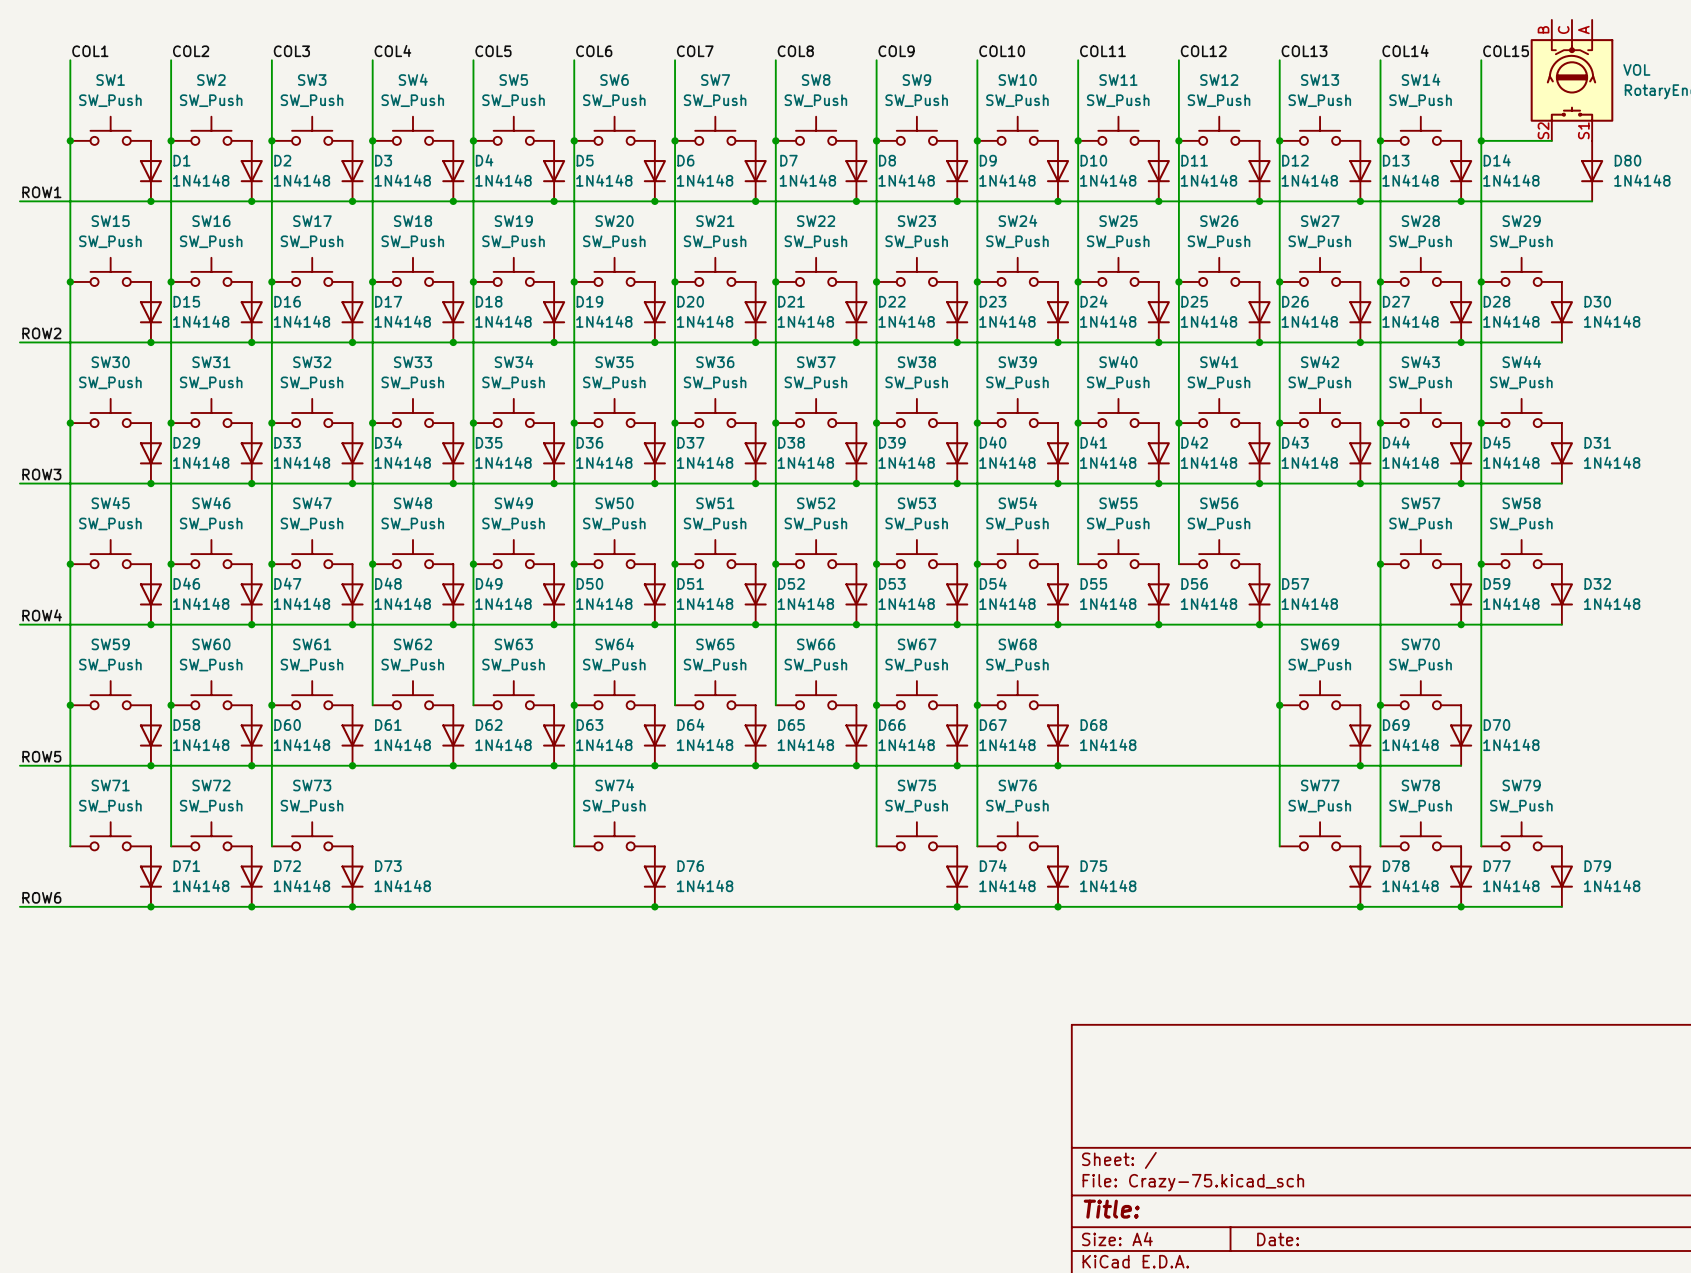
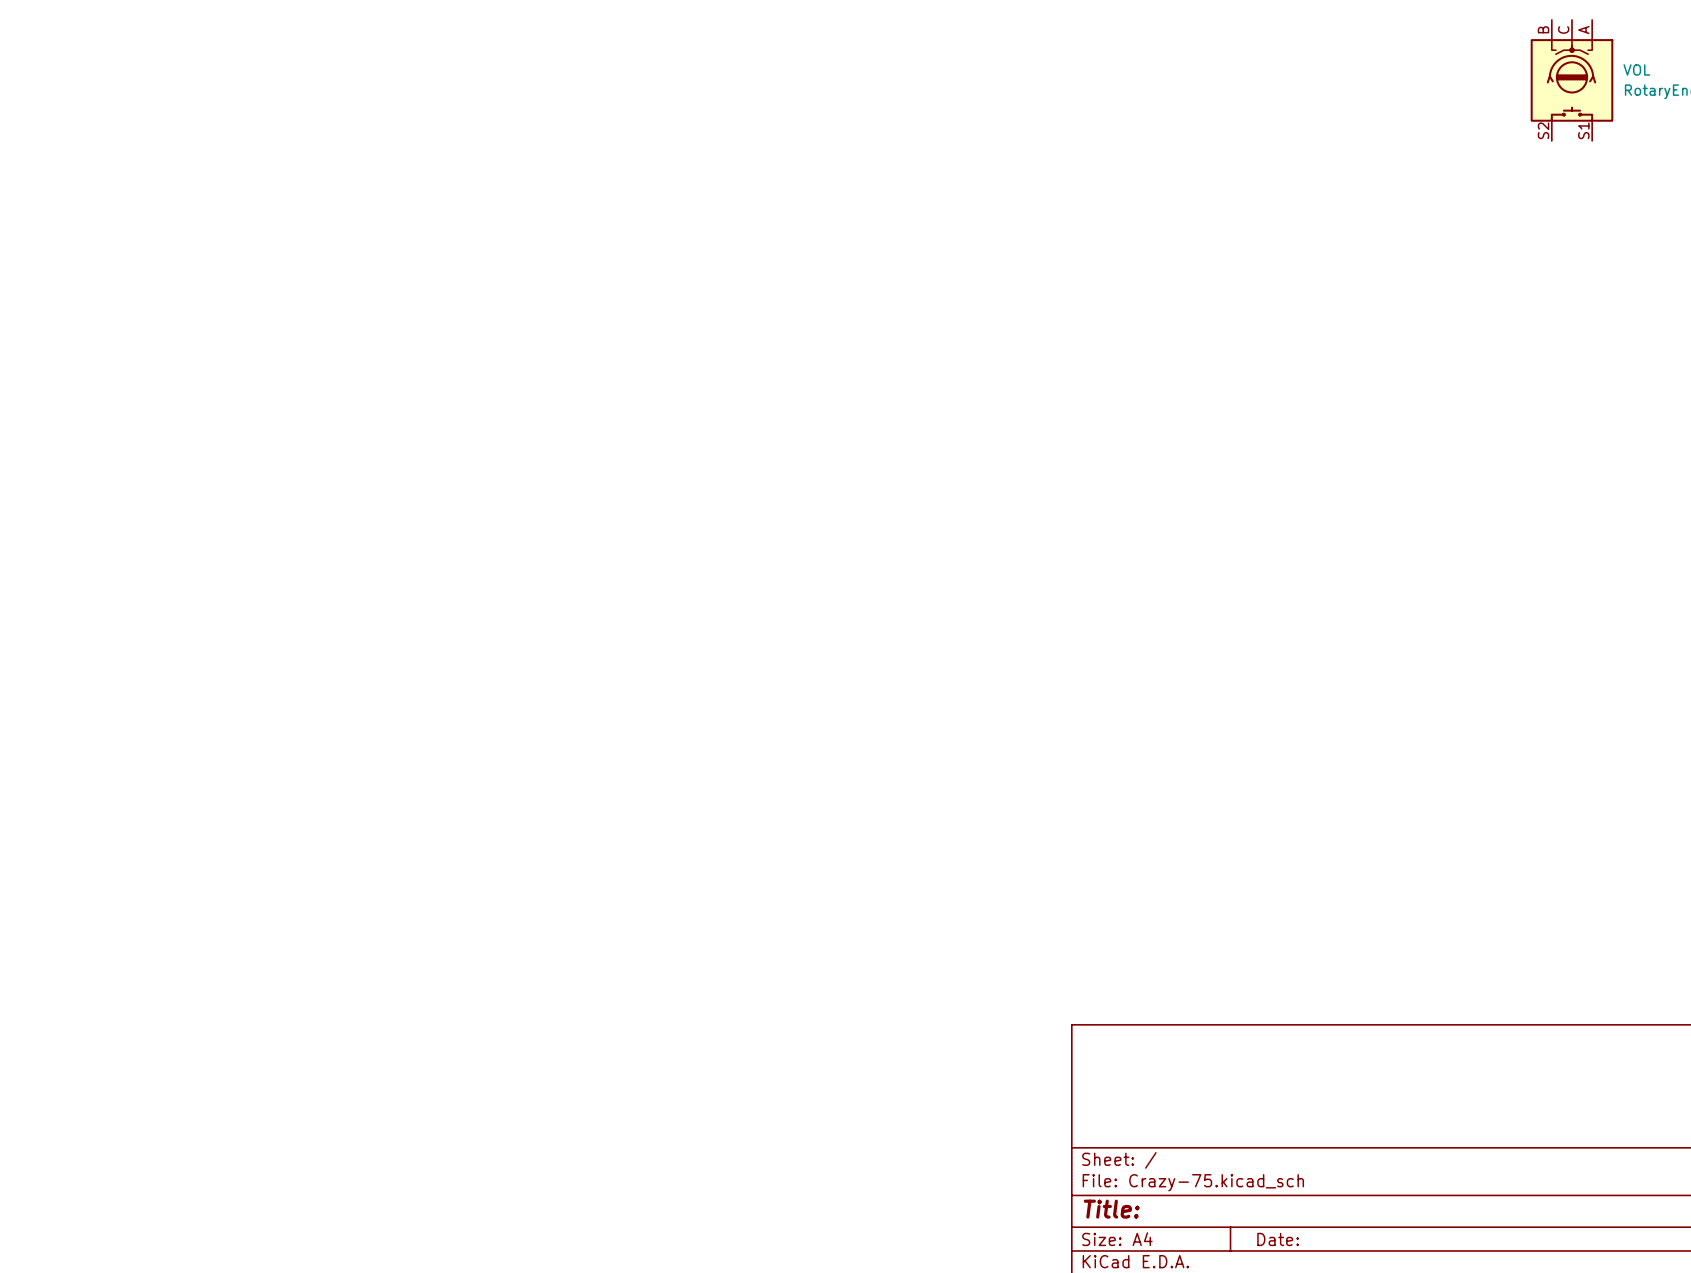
label: COL1 (90, 51) -> none
label: COL2 (191, 51) -> none
label: COL3 (291, 51) -> none
label: COL4 (392, 51) -> none
label: COL5 (493, 51) -> none
label: COL6 (594, 51) -> none
label: COL7 (695, 51) -> none
label: COL8 (795, 51) -> none
label: COL9 (896, 51) -> none
label: COL10 (1002, 51) -> none
label: COL11 (1102, 51) -> none
label: COL12 (1203, 51) -> none
label: COL13 (1304, 51) -> none
label: COL14 (1405, 51) -> none
label: COL15 (1506, 51) -> none
wire: (70, 60) (70, 846) -> none
wire: (171, 60) (171, 846) -> none
wire: (271, 60) (271, 846) -> none
wire: (372, 60) (372, 705) -> none
wire: (473, 60) (473, 705) -> none
wire: (574, 60) (574, 846) -> none
wire: (675, 60) (675, 705) -> none
wire: (775, 60) (775, 705) -> none
wire: (876, 60) (876, 846) -> none
wire: (977, 60) (977, 846) -> none
wire: (1078, 60) (1078, 564) -> none
wire: (1178, 60) (1178, 564) -> none
wire: (1279, 60) (1279, 846) -> none
wire: (1380, 60) (1380, 846) -> none
wire: (1481, 60) (1481, 846) -> none
SW1: SW_Push (110, 130) -> none
SW2: SW_Push (211, 130) -> none
SW3: SW_Push (312, 130) -> none
SW4: SW_Push (412, 130) -> none
SW5: SW_Push (513, 130) -> none
SW6: SW_Push (614, 130) -> none
SW7: SW_Push (715, 130) -> none
SW8: SW_Push (816, 130) -> none
SW9: SW_Push (916, 130) -> none
SW10: SW_Push (1017, 130) -> none
SW11: SW_Push (1118, 130) -> none
SW12: SW_Push (1219, 130) -> none
SW13: SW_Push (1320, 130) -> none
SW14: SW_Push (1420, 130) -> none
junction: (70, 140) -> none
junction: (171, 140) -> none
junction: (271, 140) -> none
junction: (372, 140) -> none
junction: (473, 140) -> none
junction: (574, 140) -> none
junction: (675, 140) -> none
junction: (775, 140) -> none
junction: (876, 140) -> none
junction: (977, 140) -> none
junction: (1078, 140) -> none
junction: (1178, 140) -> none
junction: (1279, 140) -> none
junction: (1380, 140) -> none
wire: (1481, 140) (1551, 140) -> none
junction: (1481, 140) -> none
D1: 1N4148 (150, 171) -> none
D2: 1N4148 (251, 171) -> none
D3: 1N4148 (352, 171) -> none
D4: 1N4148 (453, 171) -> none
D5: 1N4148 (554, 171) -> none
D6: 1N4148 (654, 171) -> none
D7: 1N4148 (755, 171) -> none
D8: 1N4148 (856, 171) -> none
D9: 1N4148 (957, 171) -> none
D10: 1N4148 (1058, 171) -> none
D11: 1N4148 (1158, 171) -> none
D12: 1N4148 (1259, 171) -> none
D13: 1N4148 (1360, 171) -> none
D14: 1N4148 (1461, 171) -> none
D80: 1N4148 (1592, 171) -> none
label: ROW1 (41, 192) -> none
wire: (19, 201) (1592, 201) -> none
junction: (150, 201) -> none
junction: (251, 201) -> none
junction: (352, 201) -> none
junction: (453, 201) -> none
junction: (554, 201) -> none
junction: (654, 201) -> none
junction: (755, 201) -> none
junction: (856, 201) -> none
junction: (957, 201) -> none
junction: (1058, 201) -> none
junction: (1158, 201) -> none
junction: (1259, 201) -> none
junction: (1360, 201) -> none
junction: (1461, 201) -> none
SW15: SW_Push (110, 271) -> none
SW16: SW_Push (211, 271) -> none
SW17: SW_Push (312, 271) -> none
SW18: SW_Push (412, 271) -> none
SW19: SW_Push (513, 271) -> none
SW20: SW_Push (614, 271) -> none
SW21: SW_Push (715, 271) -> none
SW22: SW_Push (816, 271) -> none
SW23: SW_Push (916, 271) -> none
SW24: SW_Push (1017, 271) -> none
SW25: SW_Push (1118, 271) -> none
SW26: SW_Push (1219, 271) -> none
SW27: SW_Push (1320, 271) -> none
SW28: SW_Push (1420, 271) -> none
SW29: SW_Push (1521, 271) -> none
junction: (70, 281) -> none
junction: (171, 281) -> none
junction: (271, 281) -> none
junction: (372, 281) -> none
junction: (473, 281) -> none
junction: (574, 281) -> none
junction: (675, 281) -> none
junction: (775, 281) -> none
junction: (876, 281) -> none
junction: (977, 281) -> none
junction: (1078, 281) -> none
junction: (1178, 281) -> none
junction: (1279, 281) -> none
junction: (1380, 281) -> none
junction: (1481, 281) -> none
D15: 1N4148 (150, 312) -> none
D16: 1N4148 (251, 312) -> none
D17: 1N4148 (352, 312) -> none
D18: 1N4148 (453, 312) -> none
D19: 1N4148 (554, 312) -> none
D20: 1N4148 (654, 312) -> none
D21: 1N4148 (755, 312) -> none
D22: 1N4148 (856, 312) -> none
D23: 1N4148 (957, 312) -> none
D24: 1N4148 (1058, 312) -> none
D25: 1N4148 (1158, 312) -> none
D26: 1N4148 (1259, 312) -> none
D27: 1N4148 (1360, 312) -> none
D28: 1N4148 (1461, 312) -> none
D30: 1N4148 (1561, 312) -> none
label: ROW2 (41, 333) -> none
wire: (19, 342) (1561, 342) -> none
junction: (150, 342) -> none
junction: (251, 342) -> none
junction: (352, 342) -> none
junction: (453, 342) -> none
junction: (554, 342) -> none
junction: (654, 342) -> none
junction: (755, 342) -> none
junction: (856, 342) -> none
junction: (957, 342) -> none
junction: (1058, 342) -> none
junction: (1158, 342) -> none
junction: (1259, 342) -> none
junction: (1360, 342) -> none
junction: (1461, 342) -> none
SW30: SW_Push (110, 412) -> none
SW31: SW_Push (211, 412) -> none
SW32: SW_Push (312, 412) -> none
SW33: SW_Push (412, 412) -> none
SW34: SW_Push (513, 412) -> none
SW35: SW_Push (614, 412) -> none
SW36: SW_Push (715, 412) -> none
SW37: SW_Push (816, 412) -> none
SW38: SW_Push (916, 412) -> none
SW39: SW_Push (1017, 412) -> none
SW40: SW_Push (1118, 412) -> none
SW41: SW_Push (1219, 412) -> none
SW42: SW_Push (1320, 412) -> none
SW43: SW_Push (1420, 412) -> none
SW44: SW_Push (1521, 412) -> none
junction: (70, 423) -> none
junction: (171, 423) -> none
junction: (271, 423) -> none
junction: (372, 423) -> none
junction: (473, 423) -> none
junction: (574, 423) -> none
junction: (675, 423) -> none
junction: (775, 423) -> none
junction: (876, 423) -> none
junction: (977, 423) -> none
junction: (1078, 423) -> none
junction: (1178, 423) -> none
junction: (1279, 423) -> none
junction: (1380, 423) -> none
junction: (1481, 423) -> none
D29: 1N4148 (150, 453) -> none
D33: 1N4148 (251, 453) -> none
D34: 1N4148 (352, 453) -> none
D35: 1N4148 (453, 453) -> none
D36: 1N4148 (554, 453) -> none
D37: 1N4148 (654, 453) -> none
D38: 1N4148 (755, 453) -> none
D39: 1N4148 (856, 453) -> none
D40: 1N4148 (957, 453) -> none
D41: 1N4148 (1058, 453) -> none
D42: 1N4148 (1158, 453) -> none
D43: 1N4148 (1259, 453) -> none
D44: 1N4148 (1360, 453) -> none
D45: 1N4148 (1461, 453) -> none
D31: 1N4148 (1561, 453) -> none
label: ROW3 (41, 474) -> none
wire: (19, 483) (1561, 483) -> none
junction: (150, 483) -> none
junction: (251, 483) -> none
junction: (352, 483) -> none
junction: (453, 483) -> none
junction: (554, 483) -> none
junction: (654, 483) -> none
junction: (755, 483) -> none
junction: (856, 483) -> none
junction: (957, 483) -> none
junction: (1058, 483) -> none
junction: (1158, 483) -> none
junction: (1259, 483) -> none
junction: (1360, 483) -> none
junction: (1461, 483) -> none
SW45: SW_Push (110, 554) -> none
SW46: SW_Push (211, 554) -> none
SW47: SW_Push (312, 554) -> none
SW48: SW_Push (412, 554) -> none
SW49: SW_Push (513, 554) -> none
SW50: SW_Push (614, 554) -> none
SW51: SW_Push (715, 554) -> none
SW52: SW_Push (816, 554) -> none
SW53: SW_Push (916, 554) -> none
SW54: SW_Push (1017, 554) -> none
SW55: SW_Push (1118, 554) -> none
SW56: SW_Push (1219, 554) -> none
SW57: SW_Push (1420, 554) -> none
SW58: SW_Push (1521, 554) -> none
junction: (70, 564) -> none
junction: (171, 564) -> none
junction: (271, 564) -> none
junction: (372, 564) -> none
junction: (473, 564) -> none
junction: (574, 564) -> none
junction: (675, 564) -> none
junction: (775, 564) -> none
junction: (876, 564) -> none
junction: (977, 564) -> none
junction: (1380, 564) -> none
junction: (1481, 564) -> none
D46: 1N4148 (150, 594) -> none
D47: 1N4148 (251, 594) -> none
D48: 1N4148 (352, 594) -> none
D49: 1N4148 (453, 594) -> none
D50: 1N4148 (554, 594) -> none
D51: 1N4148 (654, 594) -> none
D52: 1N4148 (755, 594) -> none
D53: 1N4148 (856, 594) -> none
D54: 1N4148 (957, 594) -> none
D55: 1N4148 (1058, 594) -> none
D56: 1N4148 (1158, 594) -> none
D57: 1N4148 (1259, 594) -> none
D59: 1N4148 (1461, 594) -> none
D32: 1N4148 (1561, 594) -> none
label: ROW4 (42, 615) -> none
wire: (19, 624) (1561, 624) -> none
junction: (150, 624) -> none
junction: (251, 624) -> none
junction: (352, 624) -> none
junction: (453, 624) -> none
junction: (554, 624) -> none
junction: (654, 624) -> none
junction: (755, 624) -> none
junction: (856, 624) -> none
junction: (957, 624) -> none
junction: (1058, 624) -> none
junction: (1158, 624) -> none
junction: (1259, 624) -> none
junction: (1461, 624) -> none
SW59: SW_Push (110, 695) -> none
SW60: SW_Push (211, 695) -> none
SW61: SW_Push (312, 695) -> none
SW62: SW_Push (412, 695) -> none
SW63: SW_Push (513, 695) -> none
SW64: SW_Push (614, 695) -> none
SW65: SW_Push (715, 695) -> none
SW66: SW_Push (816, 695) -> none
SW67: SW_Push (916, 695) -> none
SW68: SW_Push (1017, 695) -> none
SW69: SW_Push (1320, 695) -> none
SW70: SW_Push (1420, 695) -> none
junction: (70, 705) -> none
junction: (171, 705) -> none
junction: (271, 705) -> none
junction: (574, 705) -> none
junction: (876, 705) -> none
junction: (977, 705) -> none
junction: (1279, 705) -> none
junction: (1380, 705) -> none
D58: 1N4148 (150, 735) -> none
D60: 1N4148 (251, 735) -> none
D61: 1N4148 (352, 735) -> none
D62: 1N4148 (453, 735) -> none
D63: 1N4148 (554, 735) -> none
D64: 1N4148 (654, 735) -> none
D65: 1N4148 (755, 735) -> none
D66: 1N4148 (856, 735) -> none
D67: 1N4148 (957, 735) -> none
D68: 1N4148 (1058, 735) -> none
D69: 1N4148 (1360, 735) -> none
D70: 1N4148 (1461, 735) -> none
label: ROW5 (41, 756) -> none
wire: (19, 765) (1461, 765) -> none
junction: (150, 765) -> none
junction: (251, 765) -> none
junction: (352, 765) -> none
junction: (453, 765) -> none
junction: (554, 765) -> none
junction: (654, 765) -> none
junction: (755, 765) -> none
junction: (856, 765) -> none
junction: (957, 765) -> none
junction: (1058, 765) -> none
junction: (1360, 765) -> none
SW71: SW_Push (110, 836) -> none
SW72: SW_Push (211, 836) -> none
SW73: SW_Push (312, 836) -> none
SW74: SW_Push (614, 836) -> none
SW75: SW_Push (916, 836) -> none
SW76: SW_Push (1017, 836) -> none
SW77: SW_Push (1320, 836) -> none
SW78: SW_Push (1420, 836) -> none
SW79: SW_Push (1521, 836) -> none
D71: 1N4148 (150, 876) -> none
D72: 1N4148 (251, 876) -> none
D73: 1N4148 (352, 876) -> none
D76: 1N4148 (654, 876) -> none
D74: 1N4148 (957, 876) -> none
D75: 1N4148 (1058, 876) -> none
D78: 1N4148 (1360, 876) -> none
D77: 1N4148 (1461, 876) -> none
D79: 1N4148 (1561, 876) -> none
label: ROW6 (41, 897) -> none
wire: (19, 906) (1561, 906) -> none
junction: (150, 906) -> none
junction: (251, 906) -> none
junction: (352, 906) -> none
junction: (654, 906) -> none
junction: (957, 906) -> none
junction: (1058, 906) -> none
junction: (1360, 906) -> none
junction: (1461, 906) -> none

